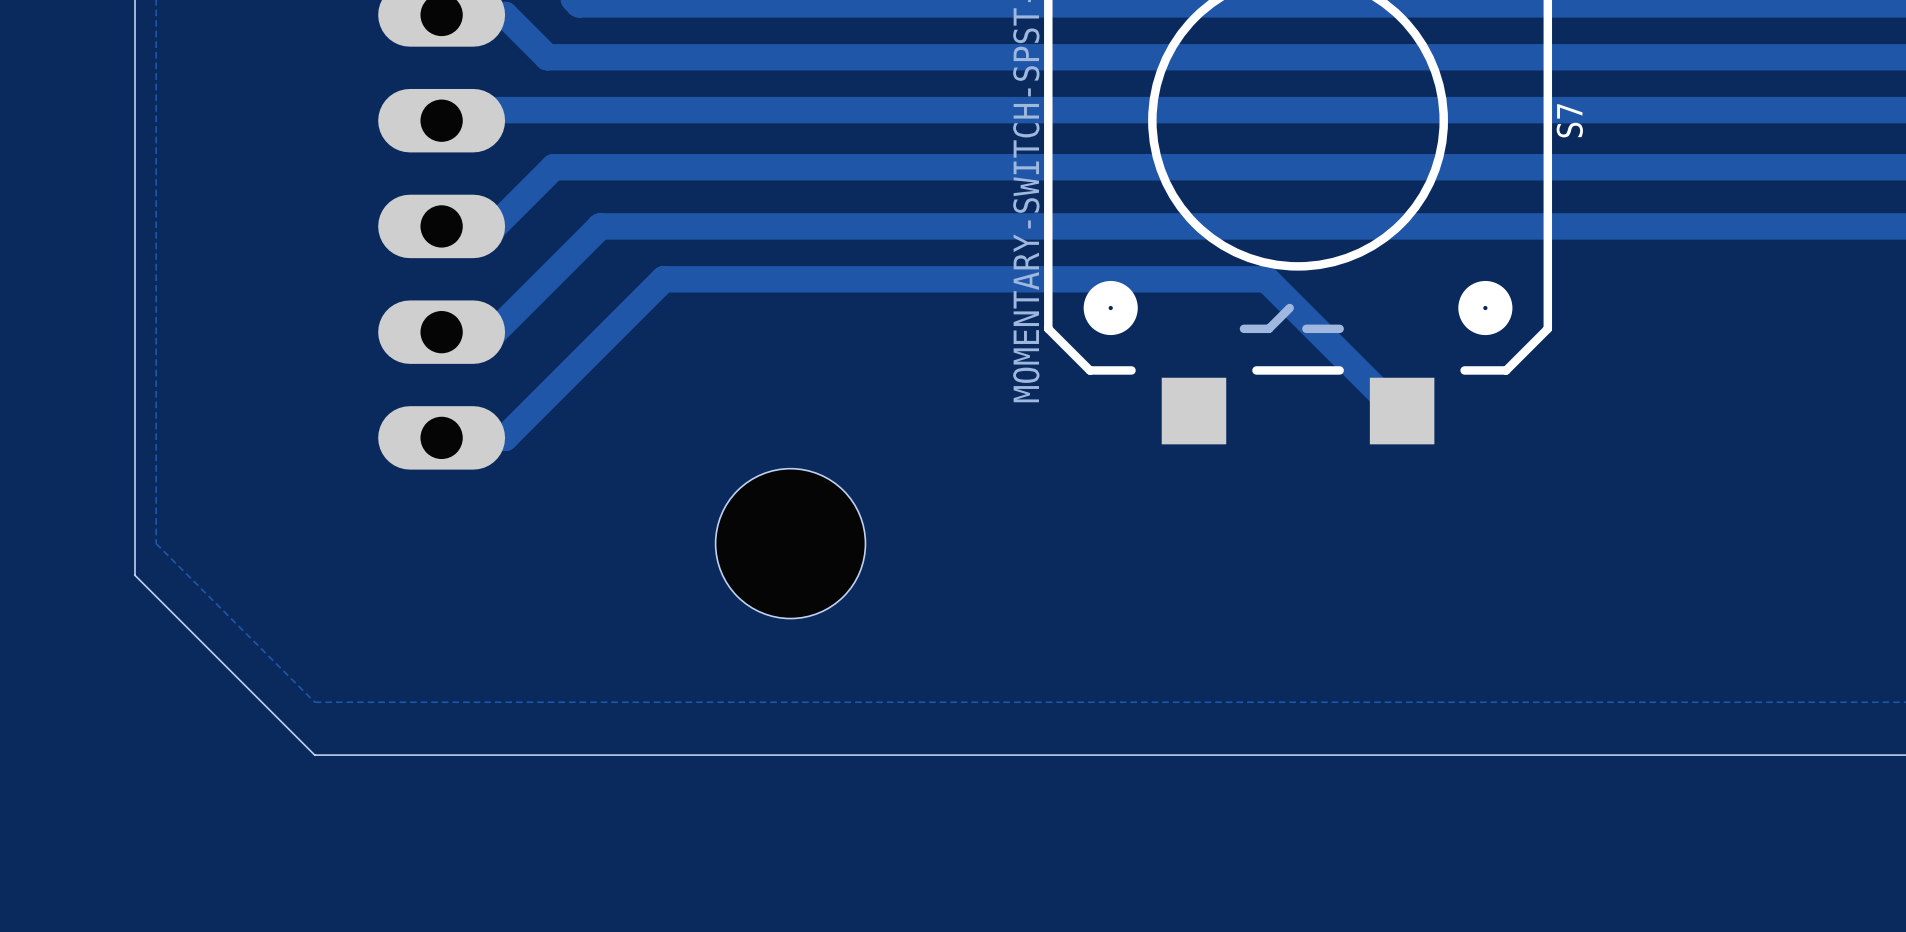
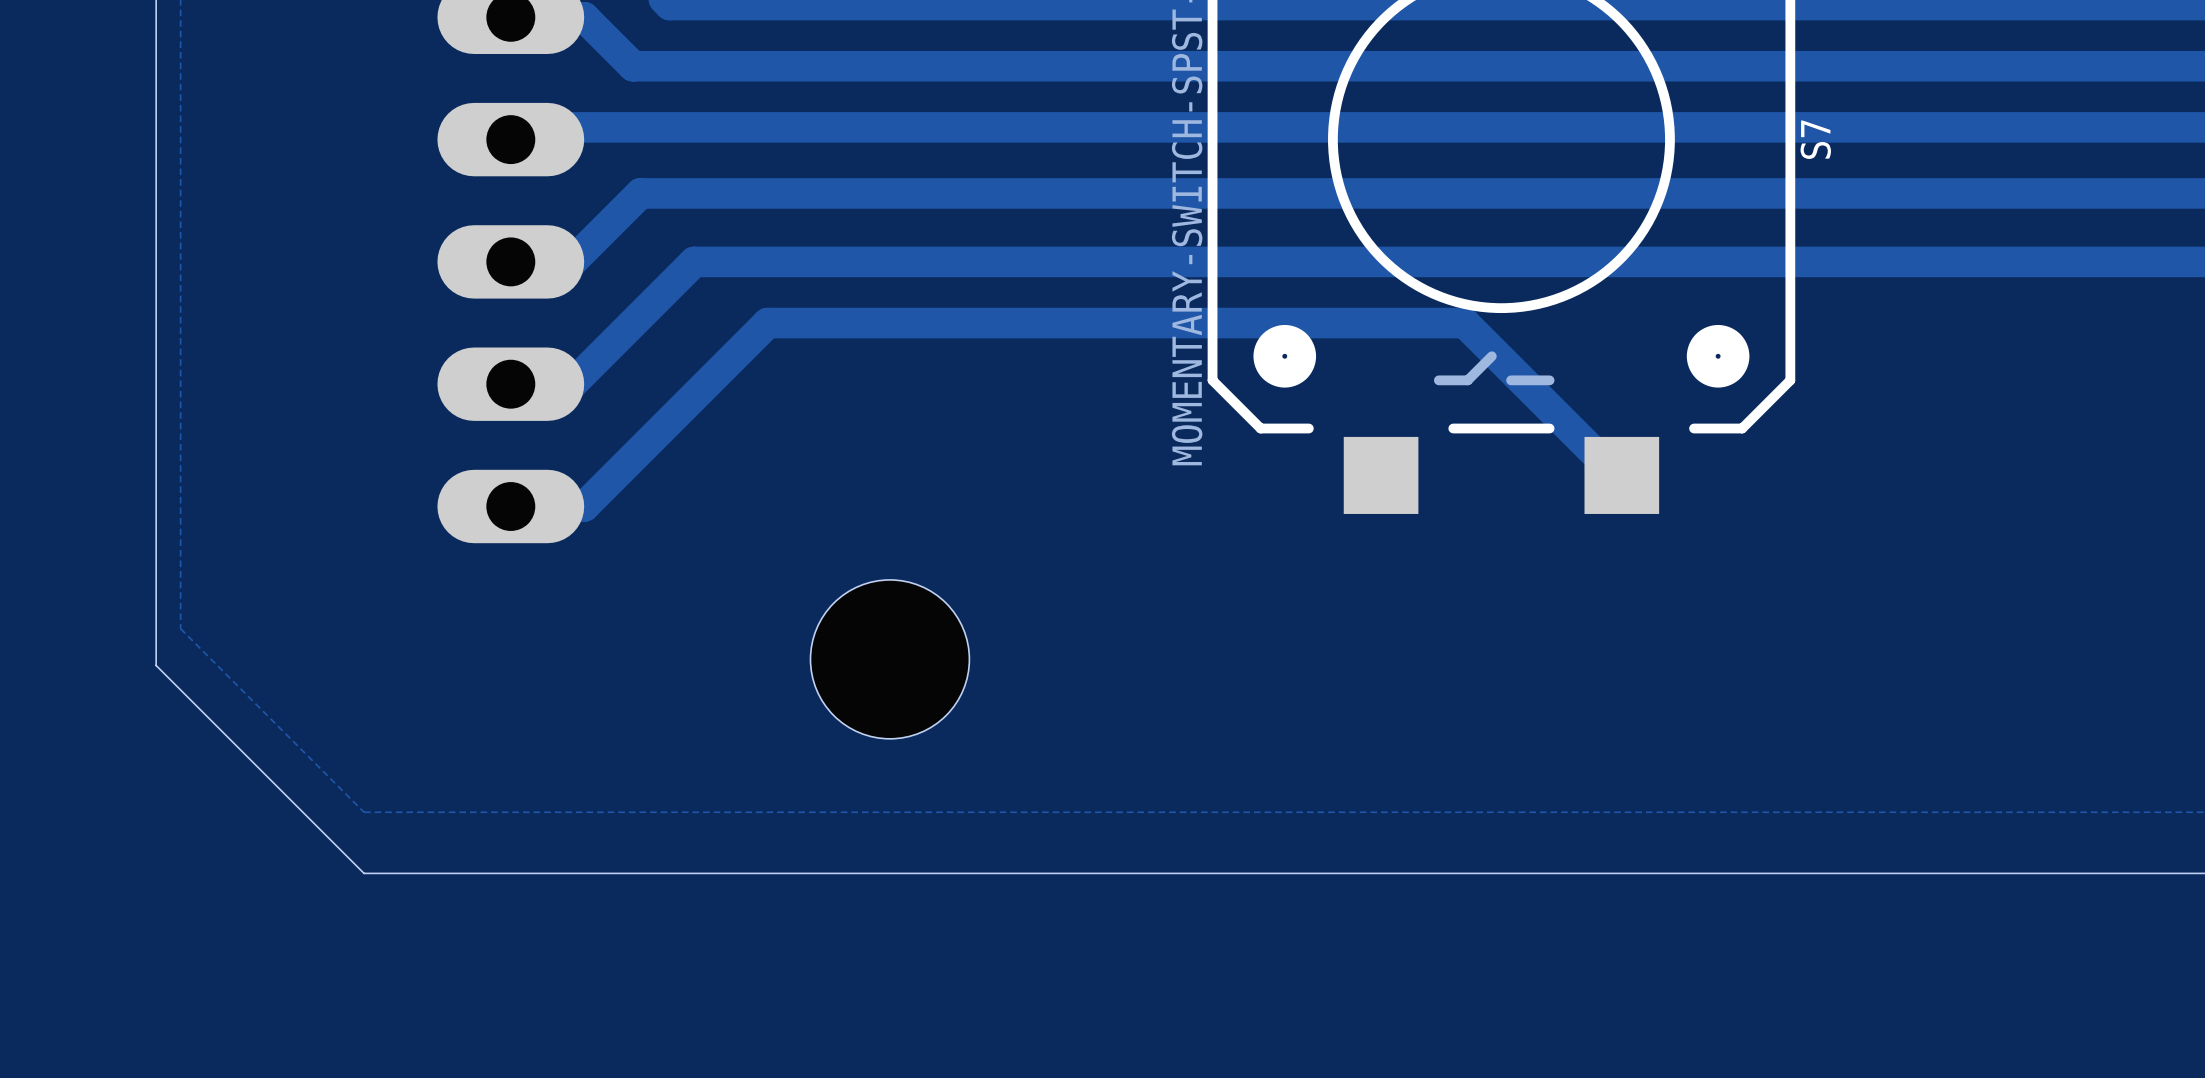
part footprint: [715, 468, 866, 619] -> [810, 579, 970, 739]

